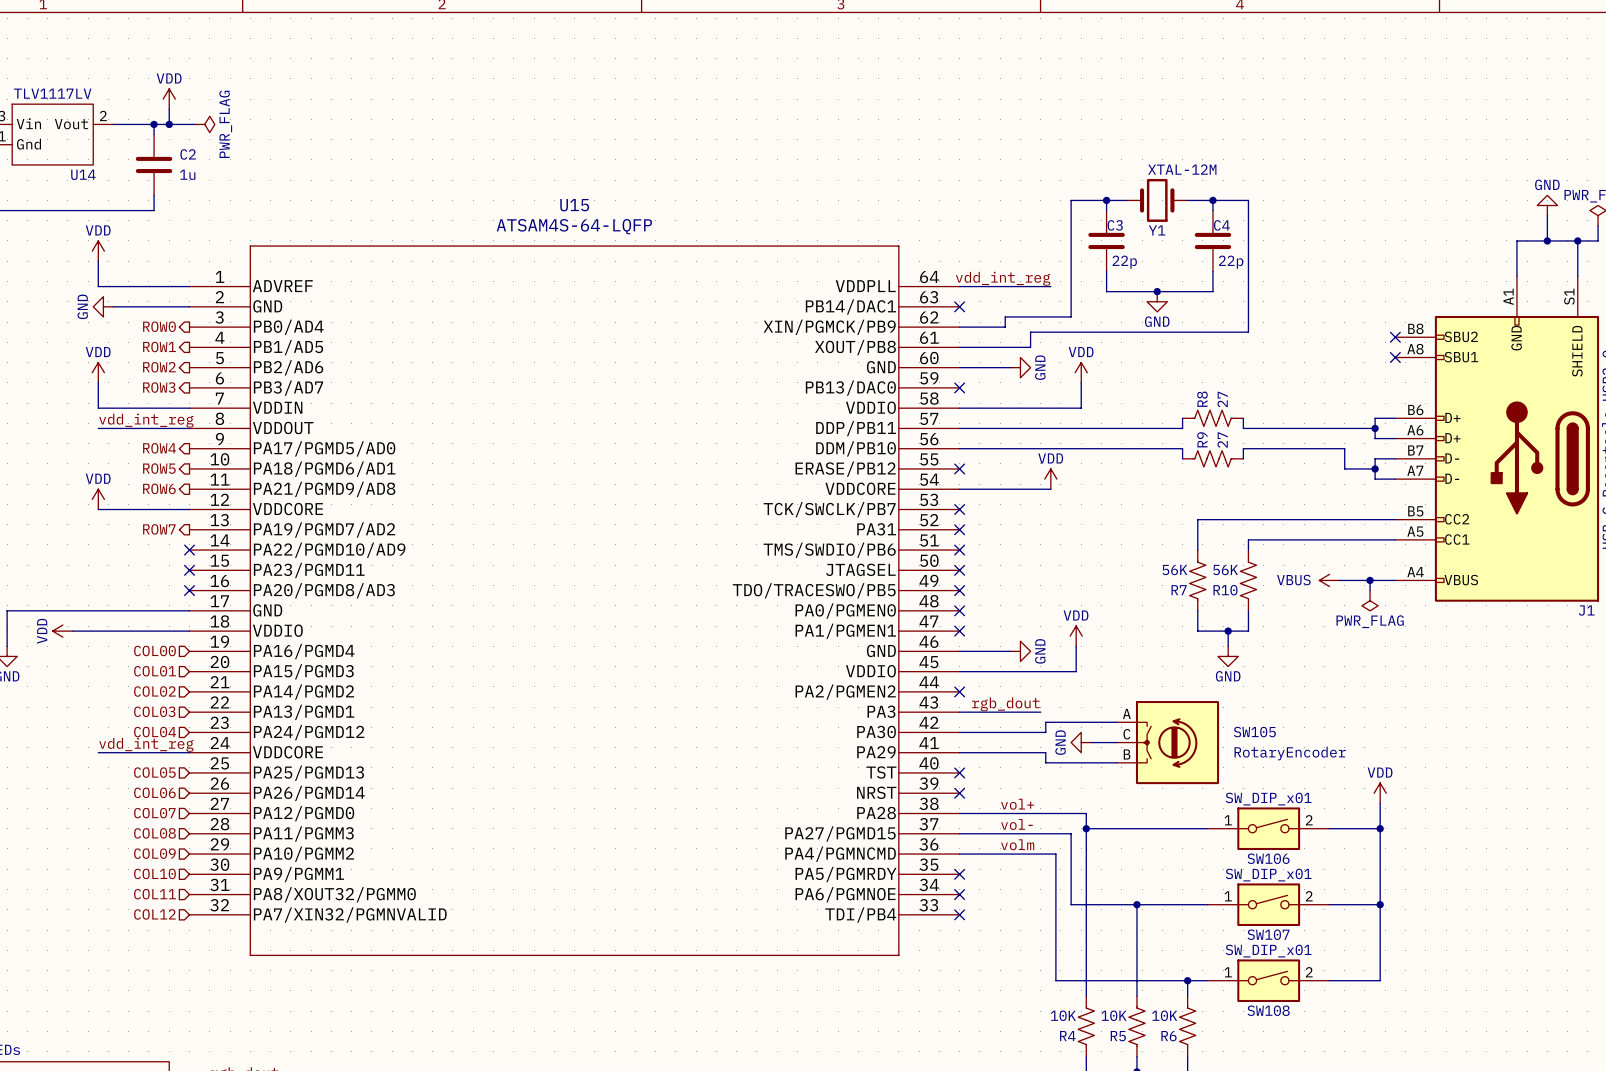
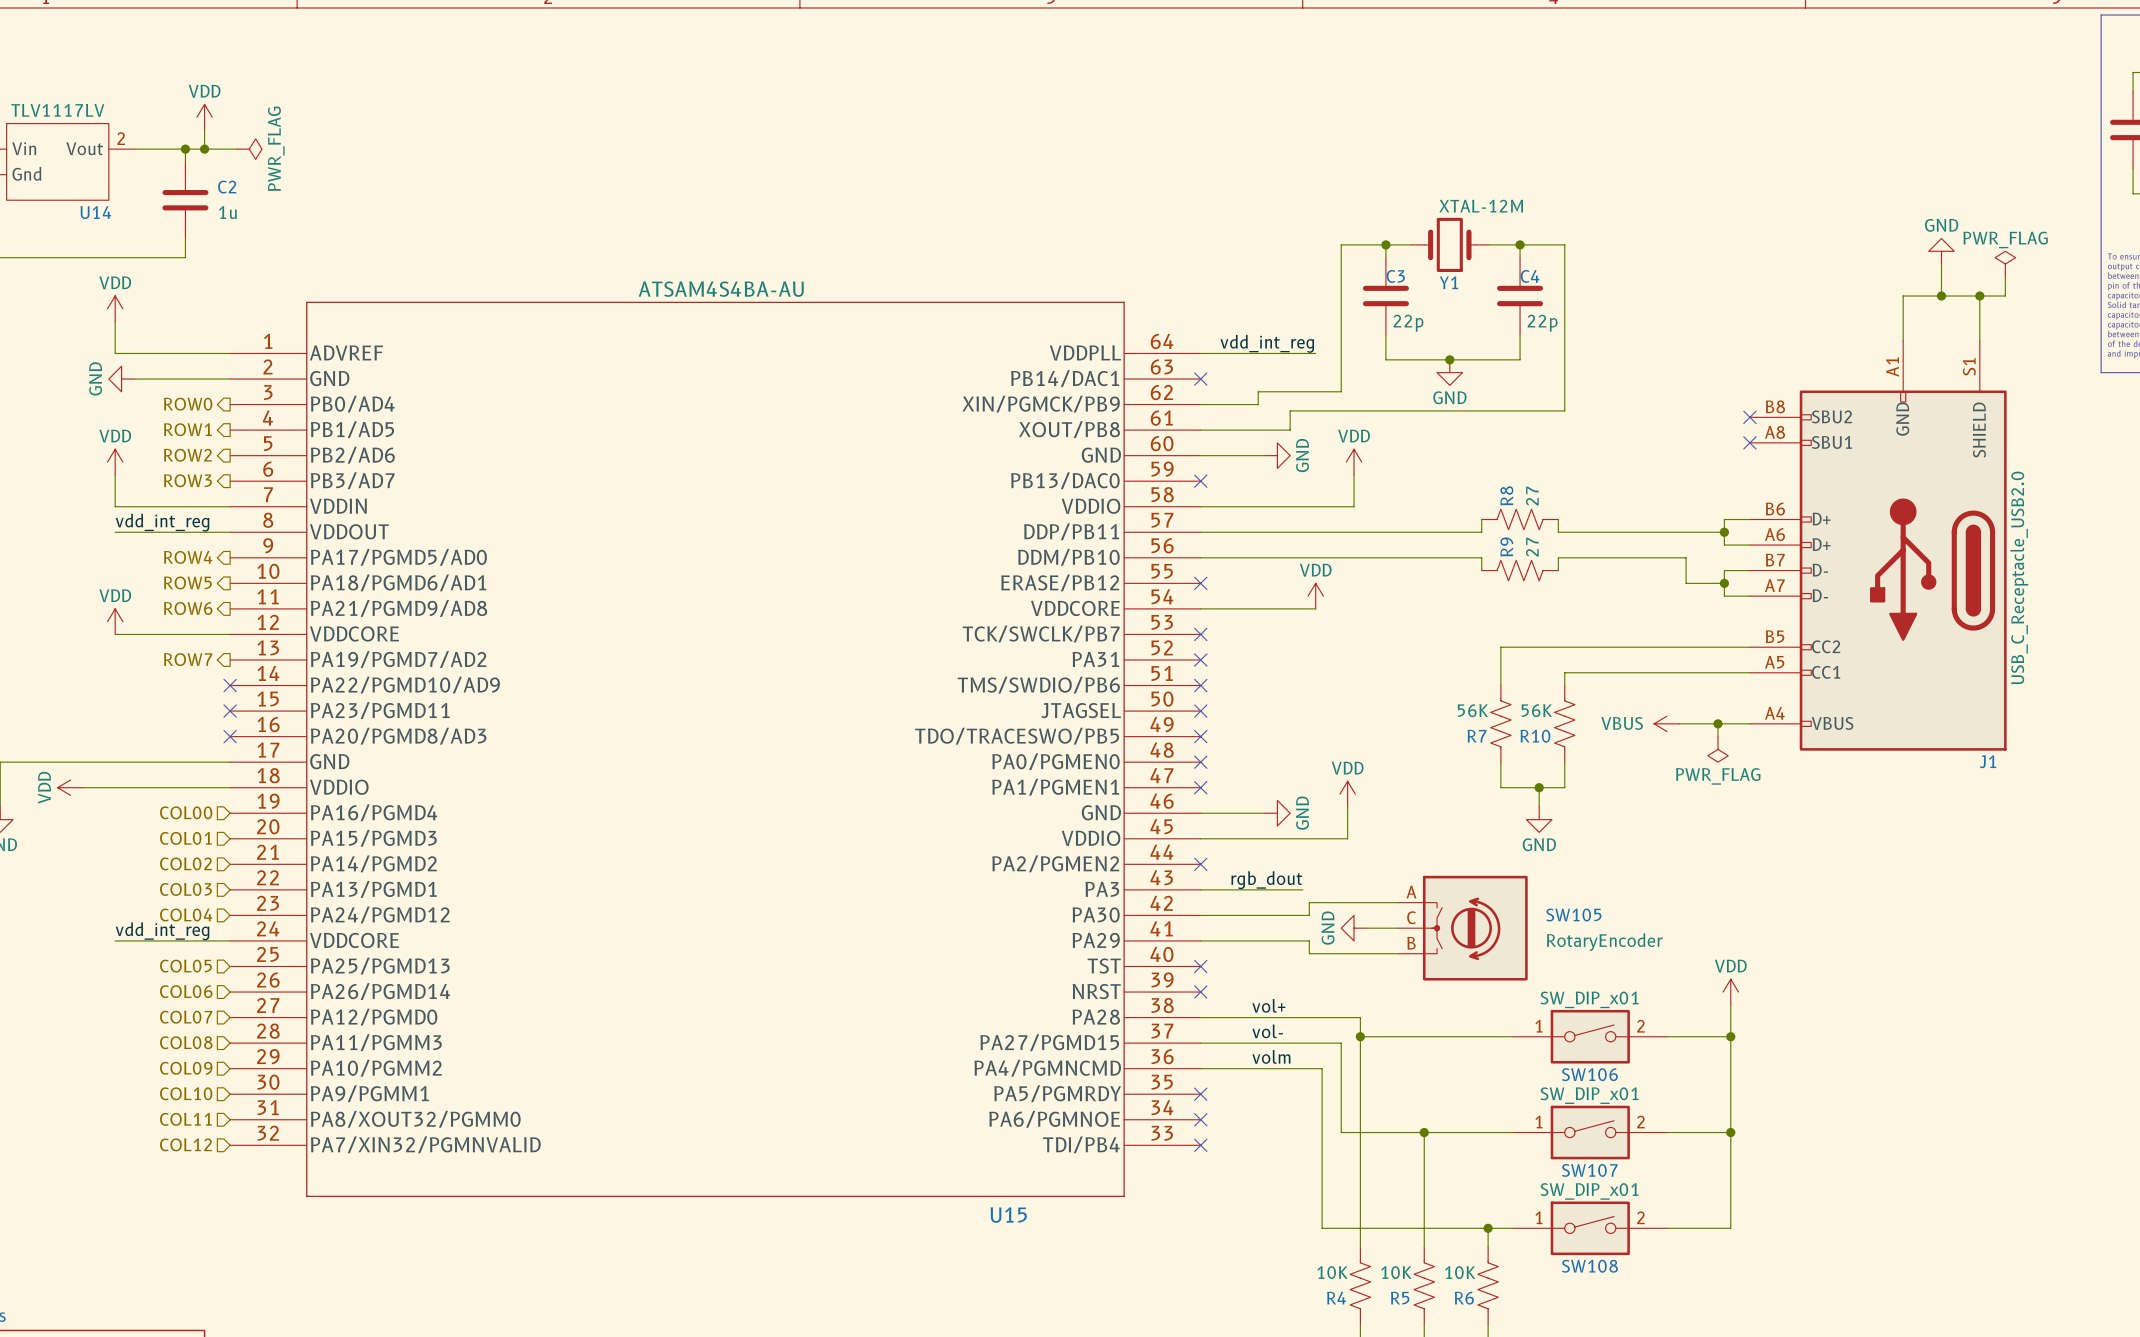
U15 name position: U15 (574, 205) -> U15 (1008, 1215)
U15 value: ATSAM4S-64-LQFP (574, 226) -> ATSAM4S4BA-AU (721, 289)

